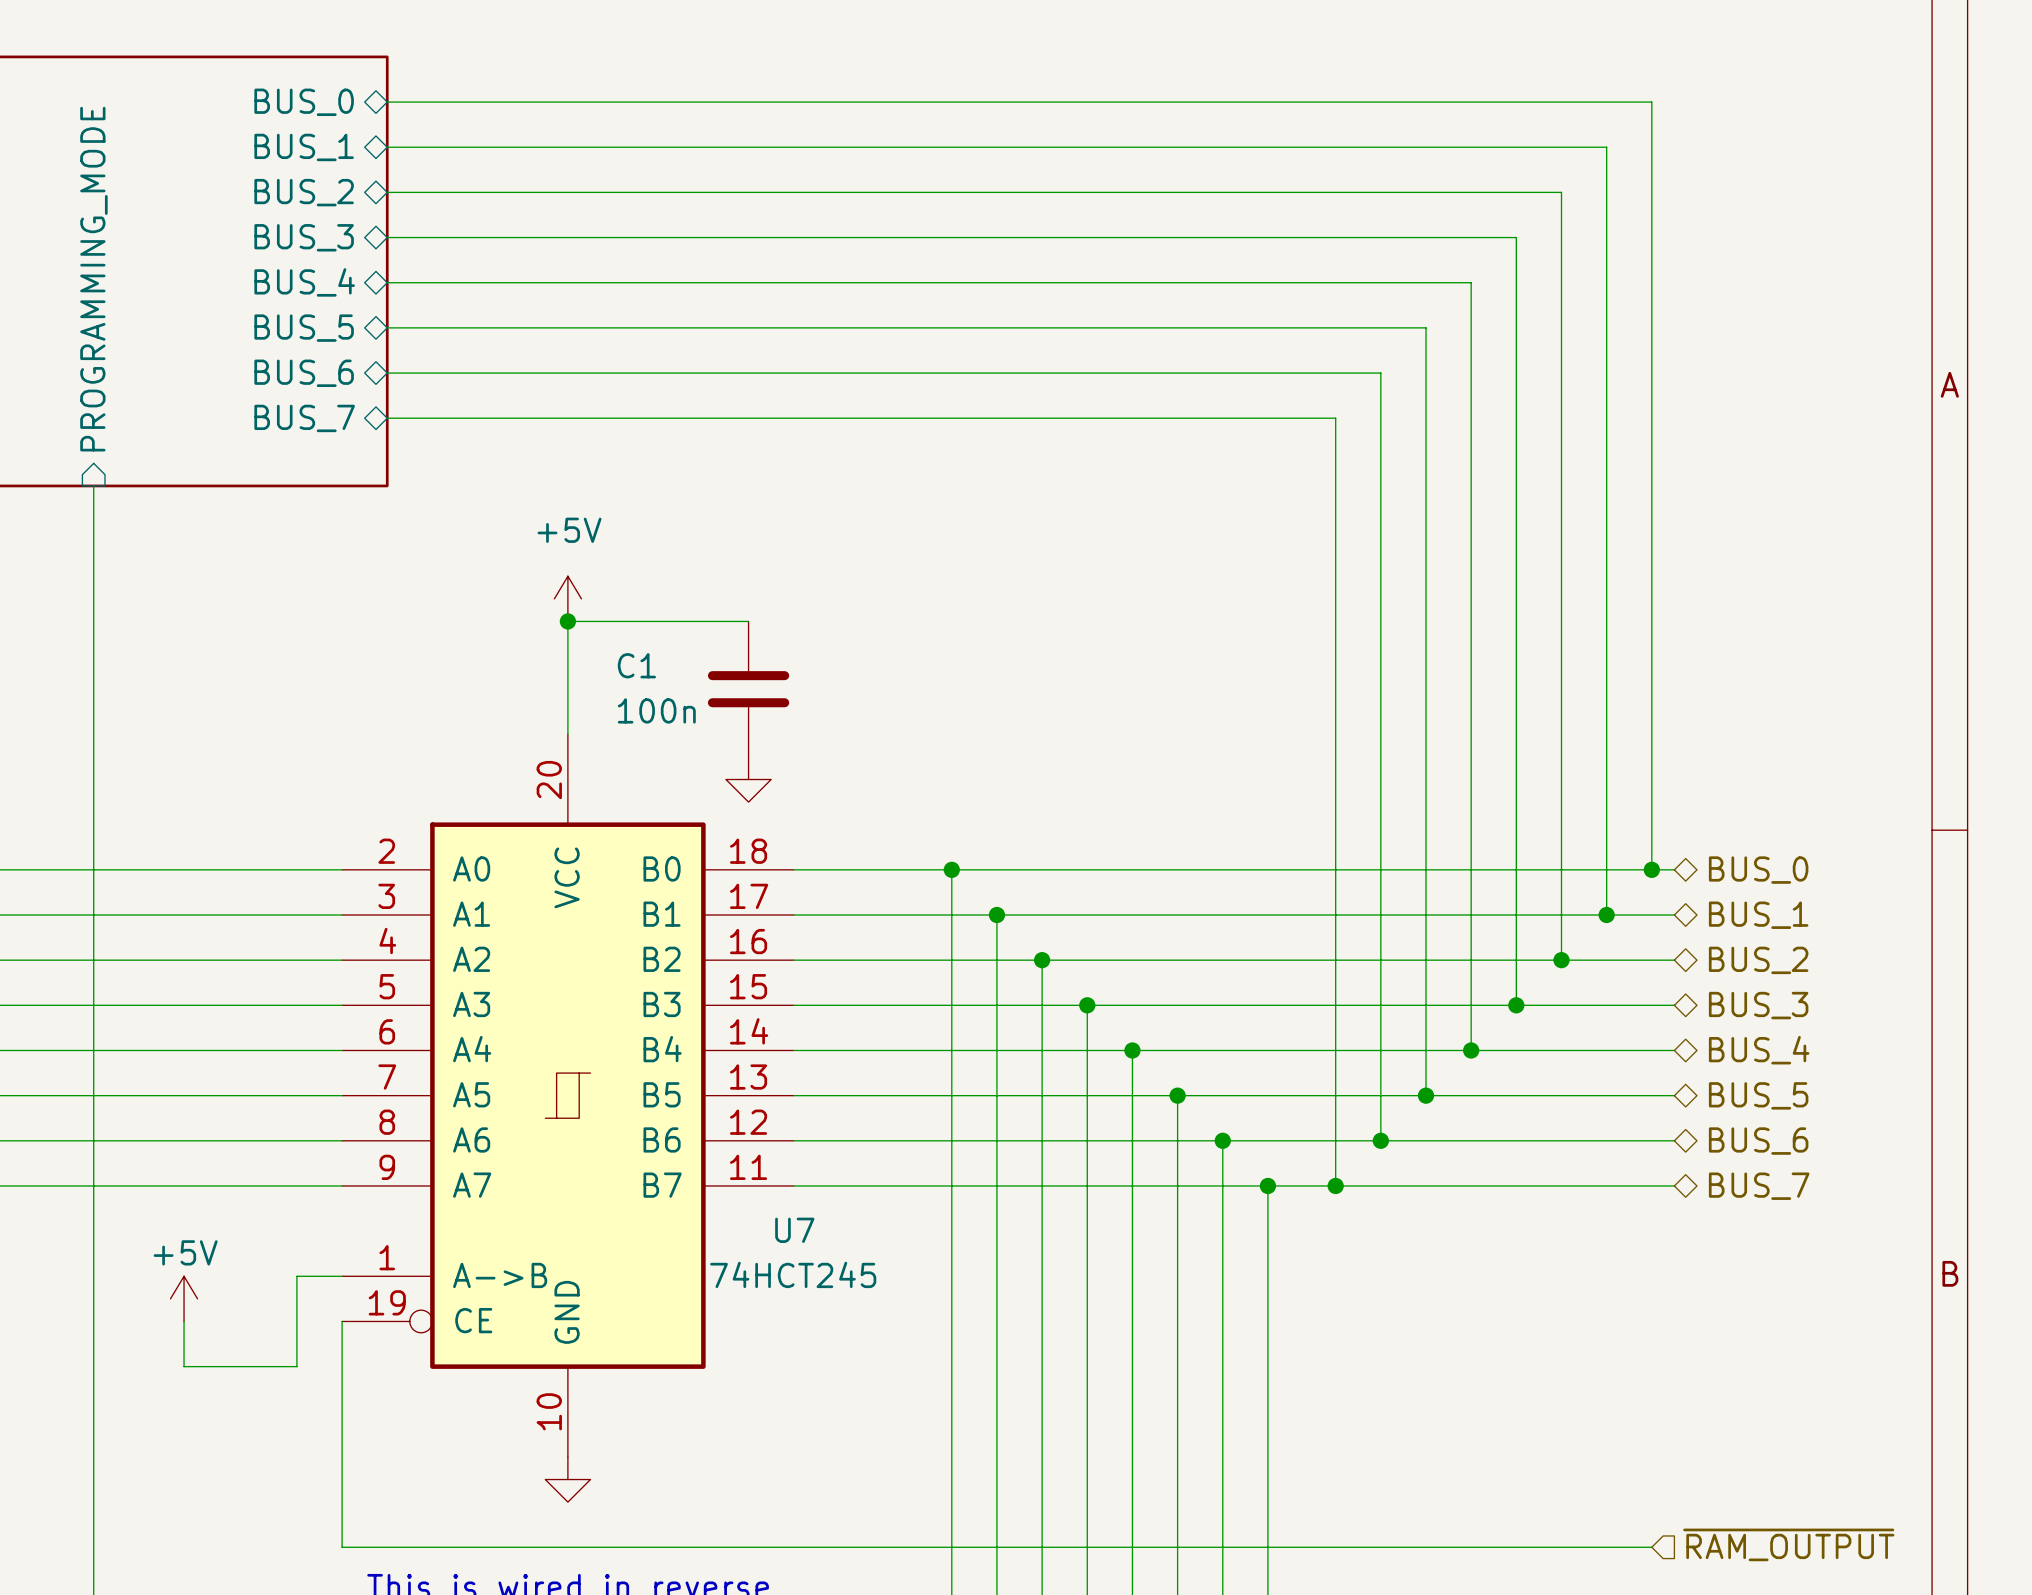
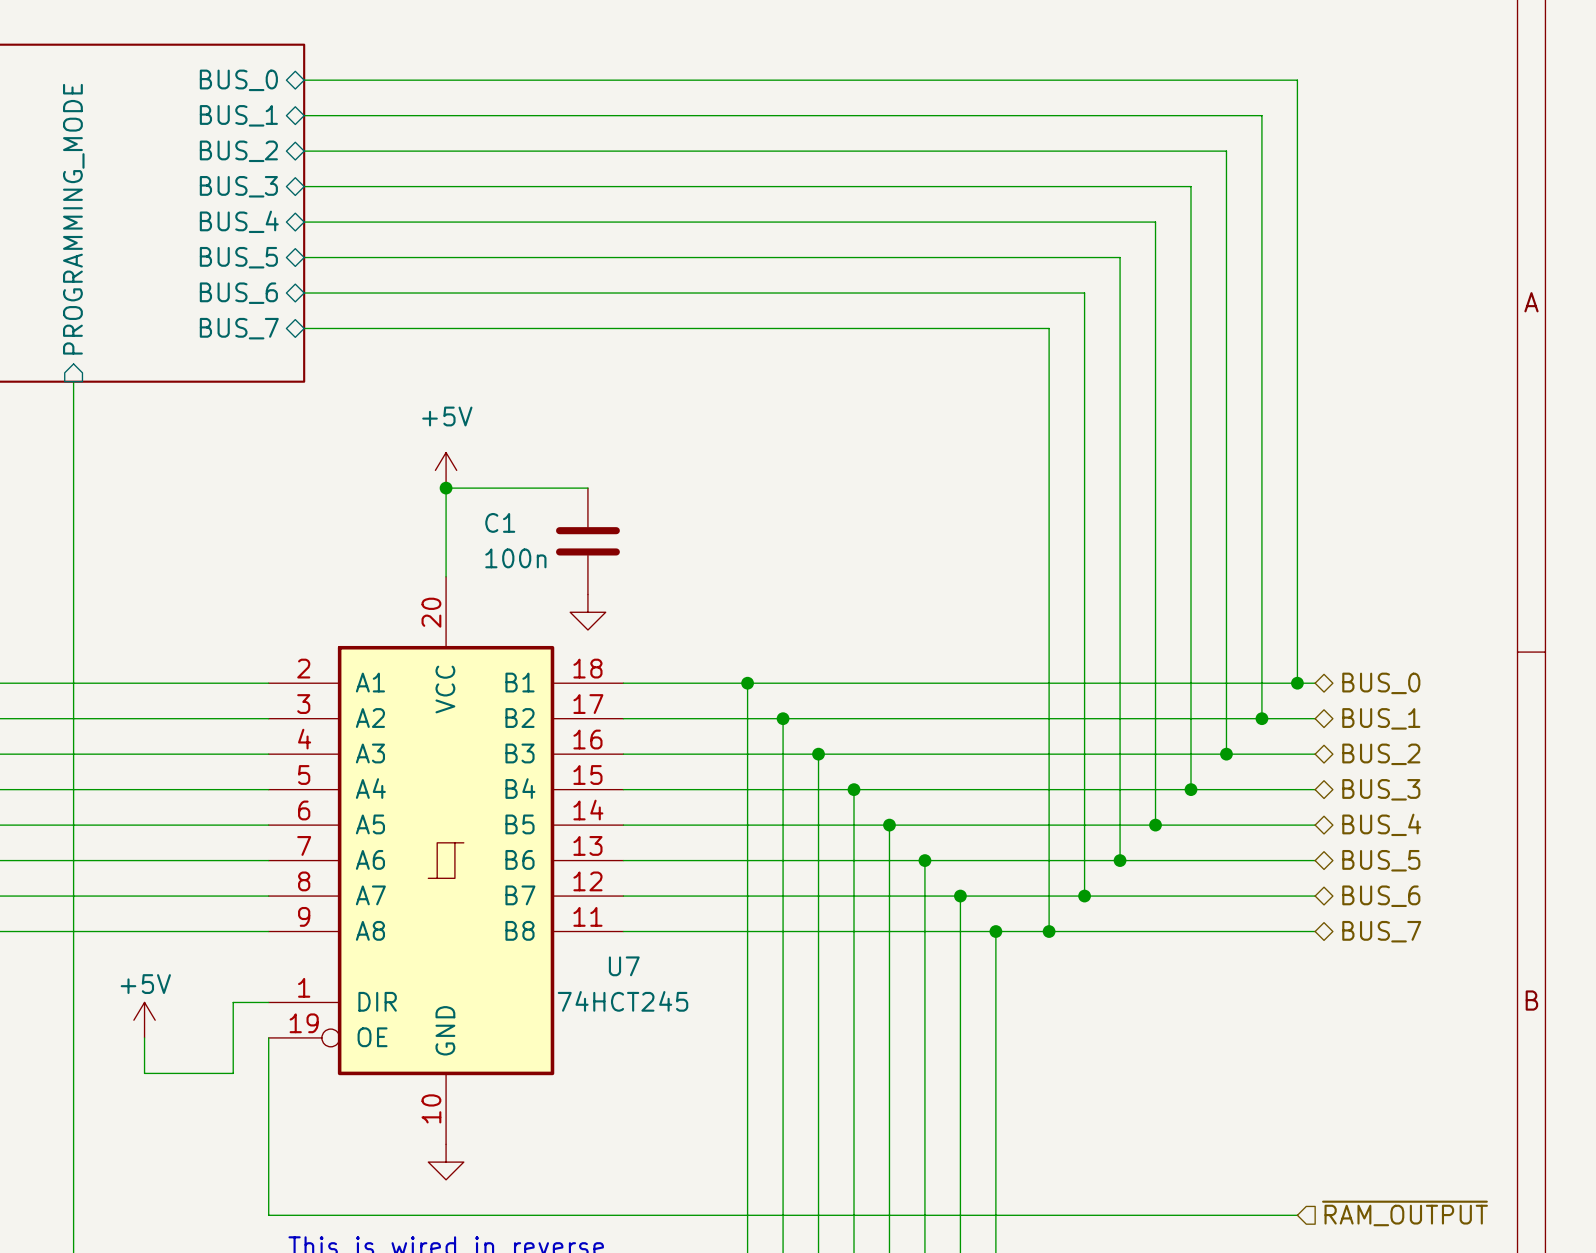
U7 symbol: [342, 734, 794, 1457] -> [268, 576, 624, 1145]

